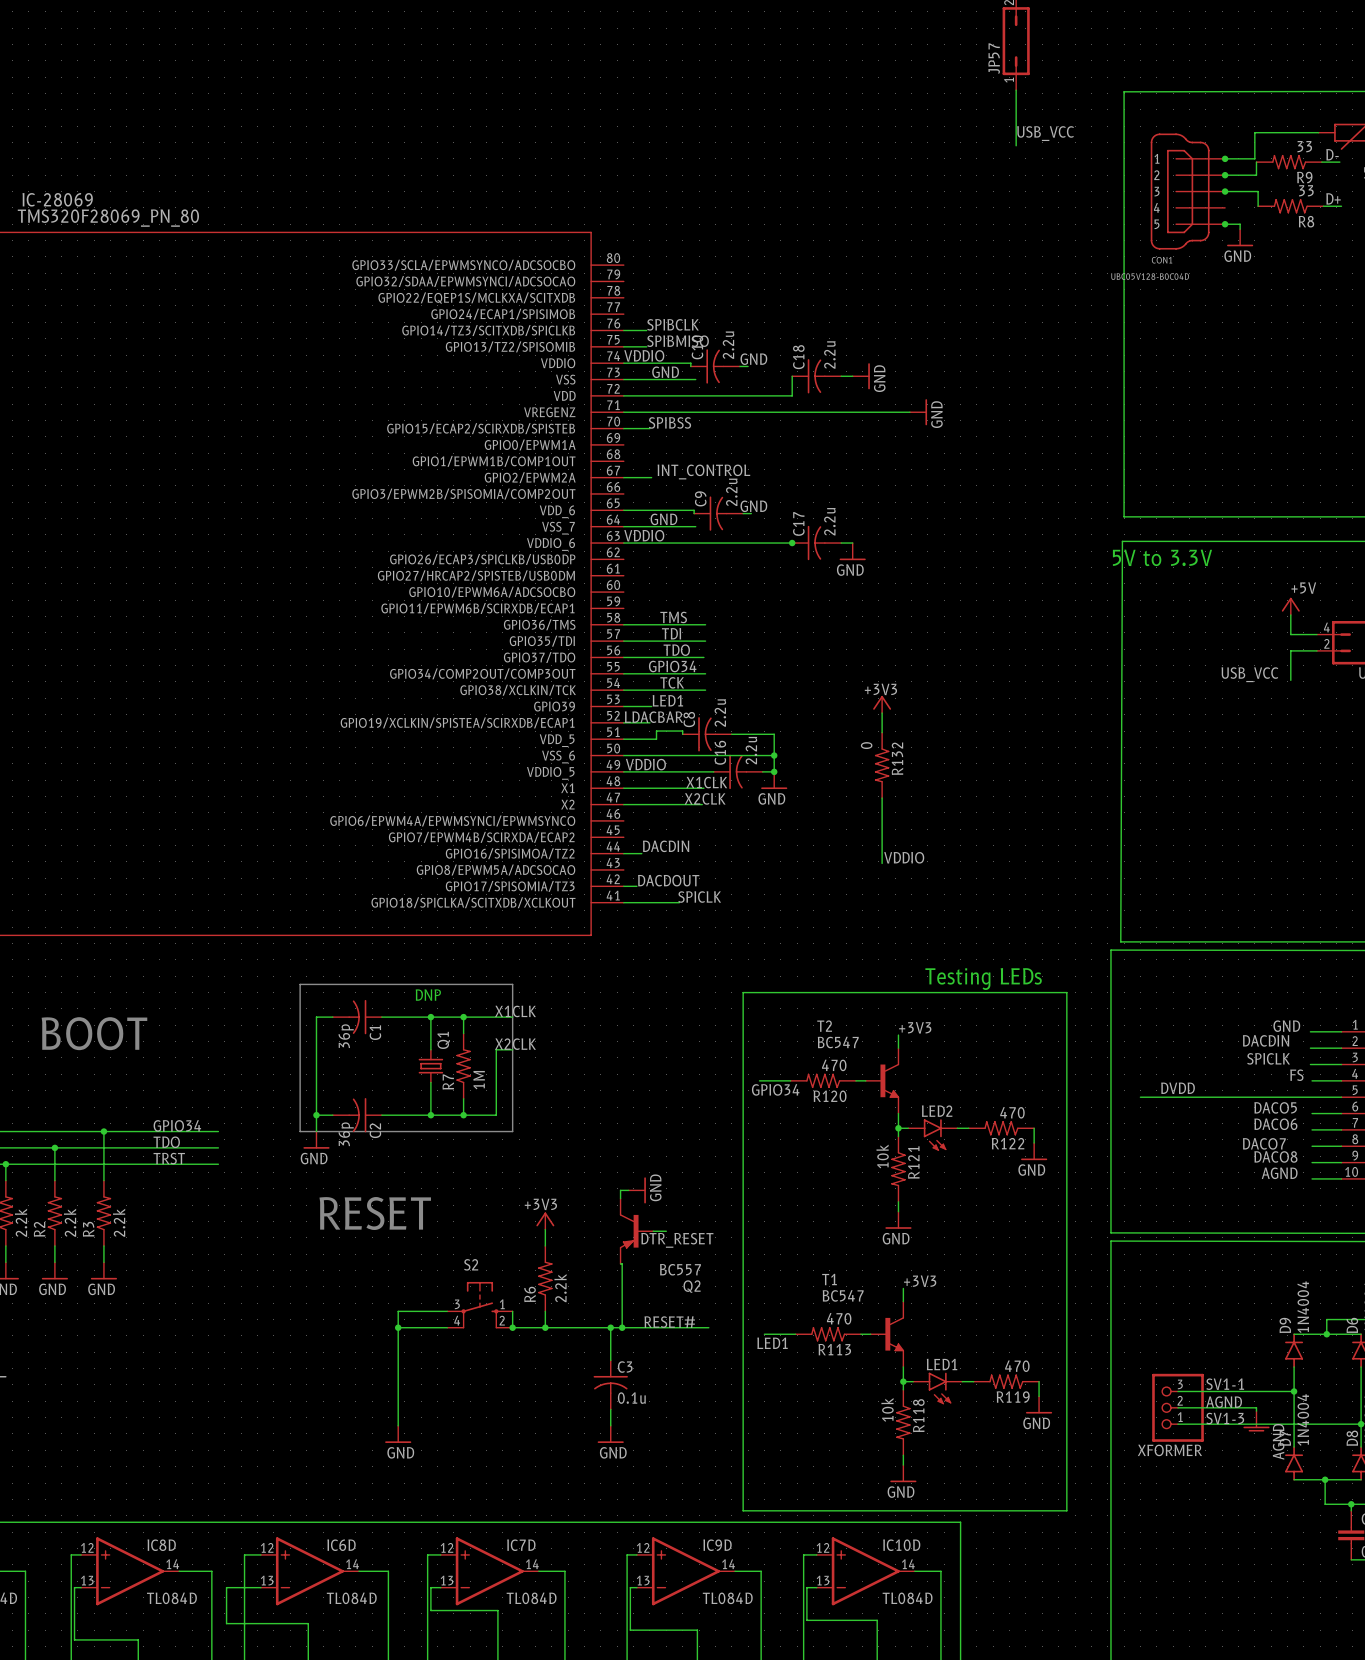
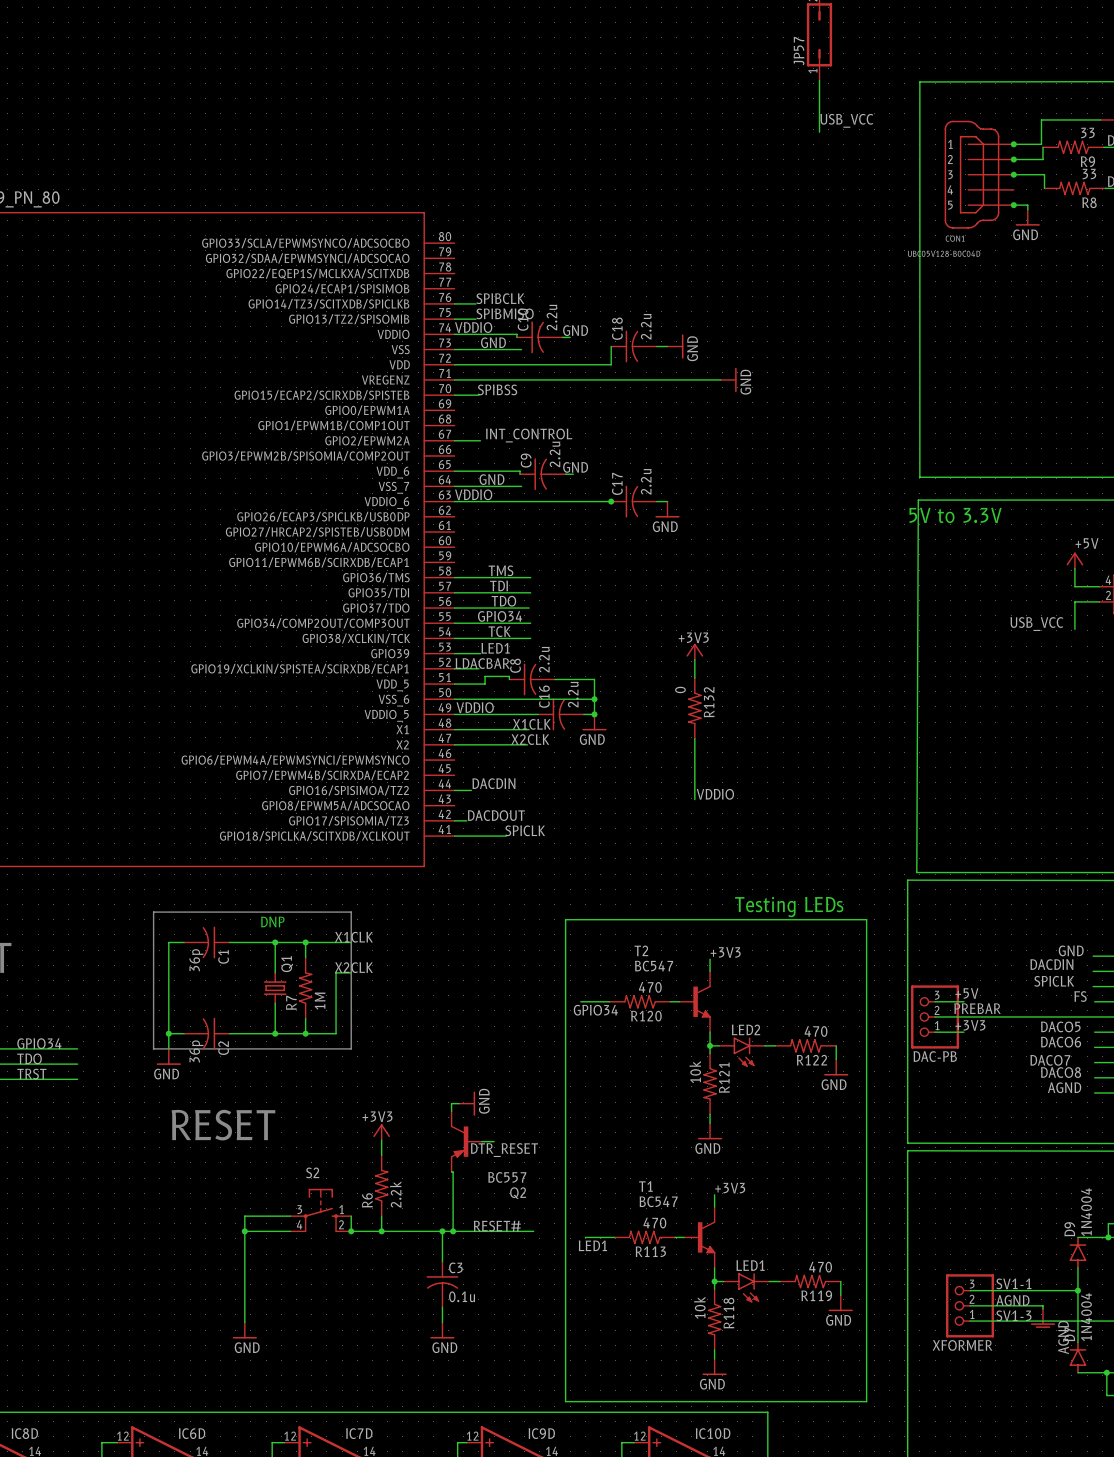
label: none -> +5V (966, 993)
wire: none -> (935, 1001) (963, 1001)
label: DVDD (1178, 1088) -> PREBAR (977, 1008)
DAC-PB: none -> (935, 1016)
label: none -> +3V3 (970, 1025)
wire: none -> (935, 1032) (963, 1032)

